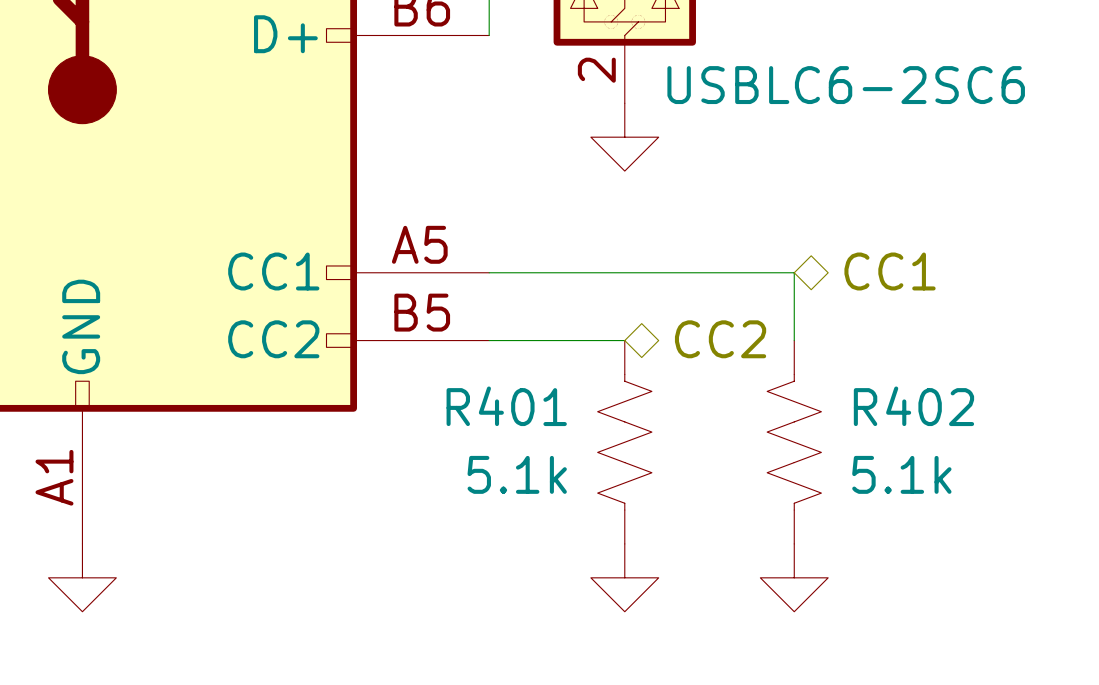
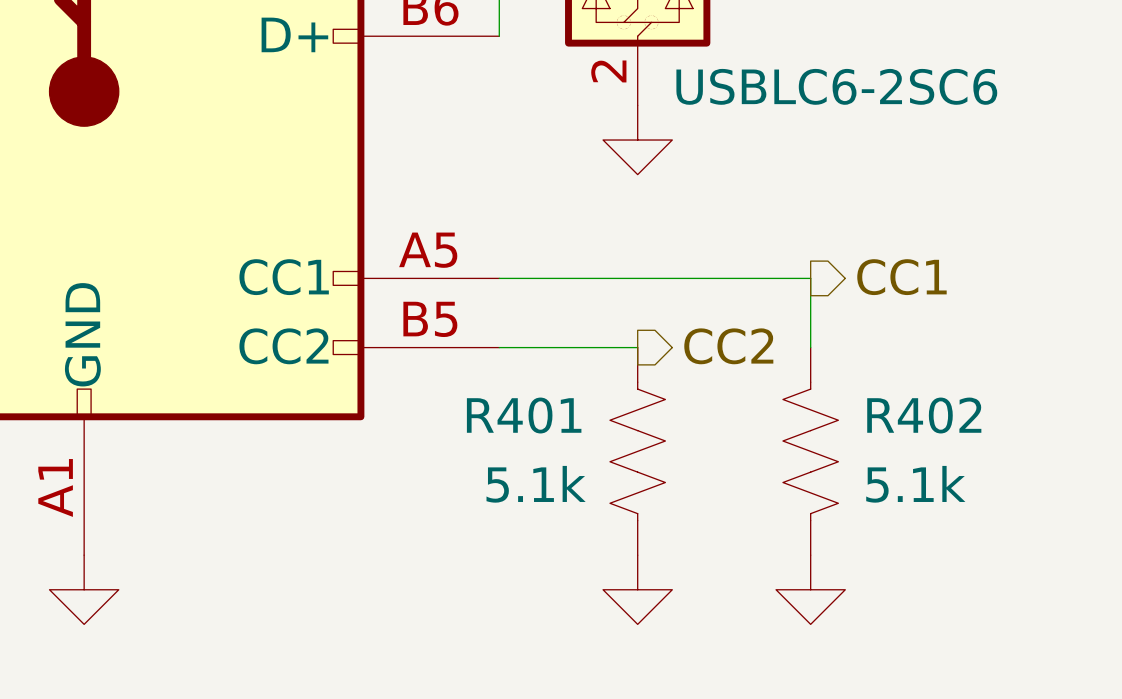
hierarchical label shape: bidirectional (890, 271) -> output (901, 277)
hierarchical label shape: bidirectional (720, 339) -> output (728, 346)

